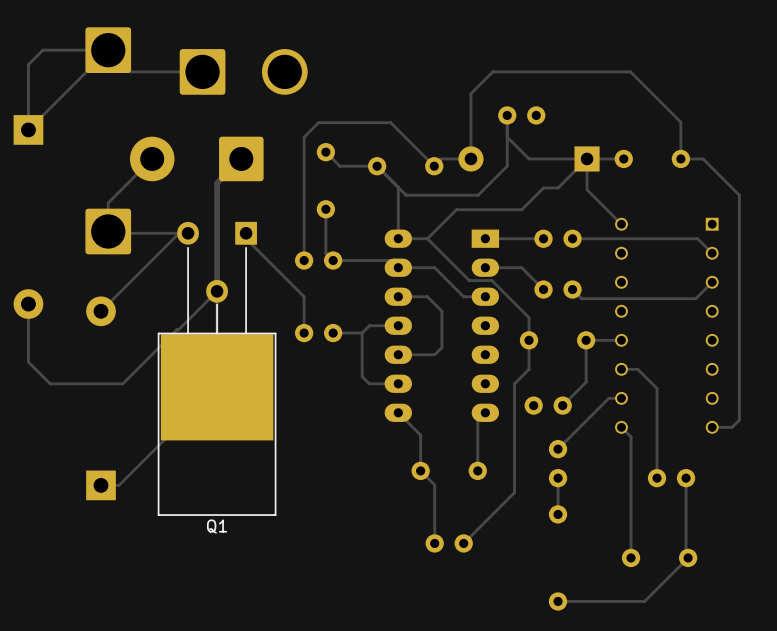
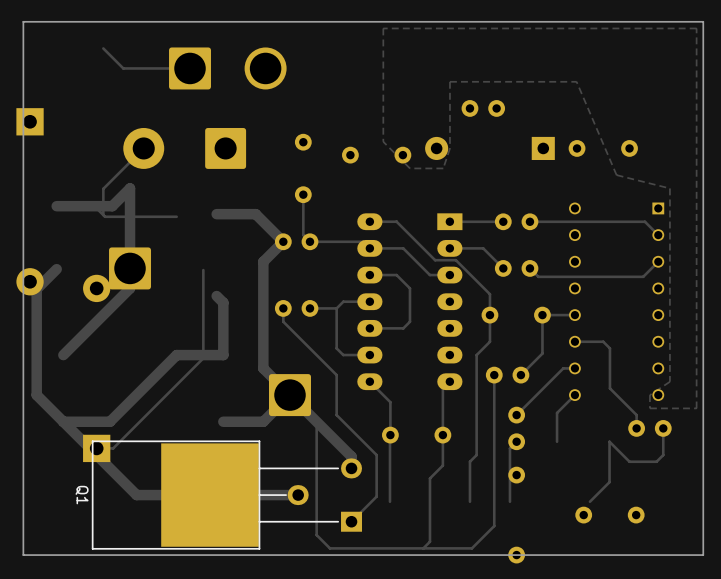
board edge: none -> (703, 21) (703, 555) (23, 555) (23, 21) (703, 21)
zone outline: none -> (696, 28) (696, 408) (649, 408) (649, 395) (669, 381) (669, 188) (616, 175) (576, 81) (449, 81) (449, 148) (443, 168) (409, 168) (383, 141) (383, 28) (696, 28)
track: (108, 50) (28, 129) (28, 64) (42, 50) (108, 50) -> none
part: (108, 50) -> none
track: (507, 115) (507, 166) (478, 195) (405, 195) (377, 166) (339, 166) (325, 152) -> none
track: (507, 137) (529, 158) (623, 158) -> none
track: (241, 178) (241, 158) (217, 183) (217, 291) (122, 383) (50, 383) (28, 362) (28, 304) -> none
track: (398, 187) (398, 238) -> none
track: none -> (56, 206) (112, 206) (130, 188) (130, 288) (63, 355)
track: (621, 224) (587, 189) (587, 158) (558, 187) (543, 187) (521, 209) (456, 209) (427, 238) -> none
track: none -> (216, 214) (255, 214) (283, 241) (263, 261) (263, 368) (351, 456) (351, 468)
part position: (108, 231) -> (130, 268)
track: (179, 233) (101, 311) -> none
track: (246, 233) (246, 238) (304, 296) (304, 333) -> (351, 521) (376, 496) (376, 455) (336, 415) (336, 375) (283, 321) (283, 308)
track: (304, 260) (304, 137) (318, 122) (390, 122) (434, 166) (441, 158) (470, 158) (470, 93) (492, 71) (630, 71) (680, 122) (680, 158) (703, 158) (739, 195) (739, 420) (732, 427) (712, 427) -> none
track: none -> (56, 269) (36, 289) (36, 395) (136, 495) (298, 495)
track: none -> (216, 296) (223, 302) (223, 355) (176, 355) (110, 421) (63, 421)
Q1 rotation: 0° (217, 368) -> 90° clockwise (227, 495)
track: (637, 369) (657, 388) (657, 478) -> (589, 341) (603, 341) (609, 348) (609, 388) (636, 415) (636, 428)
track: none -> (494, 375) (494, 526) (471, 548) (329, 548) (316, 535) (316, 421) (289, 395) (263, 421) (223, 421)
part: none -> (289, 395)
track: (621, 427) (631, 436) (631, 557) -> (574, 395) (557, 412) (557, 441)
track: none -> (663, 428) (663, 455) (656, 461) (629, 461) (609, 441) (609, 482) (589, 501)
track: (420, 470) (434, 484) (434, 543) -> (390, 435) (389, 501)
track: none -> (442, 435) (442, 465) (429, 478) (429, 541) (423, 548)
track: (558, 478) (558, 514) -> (516, 441) (509, 448) (509, 501)
part position: (671, 478) -> (649, 428)
track: (686, 478) (686, 555) (688, 557) (644, 601) (558, 601) -> none
track: (507, 499) (463, 543) -> (469, 461) (469, 501)
part: (449, 543) -> none

